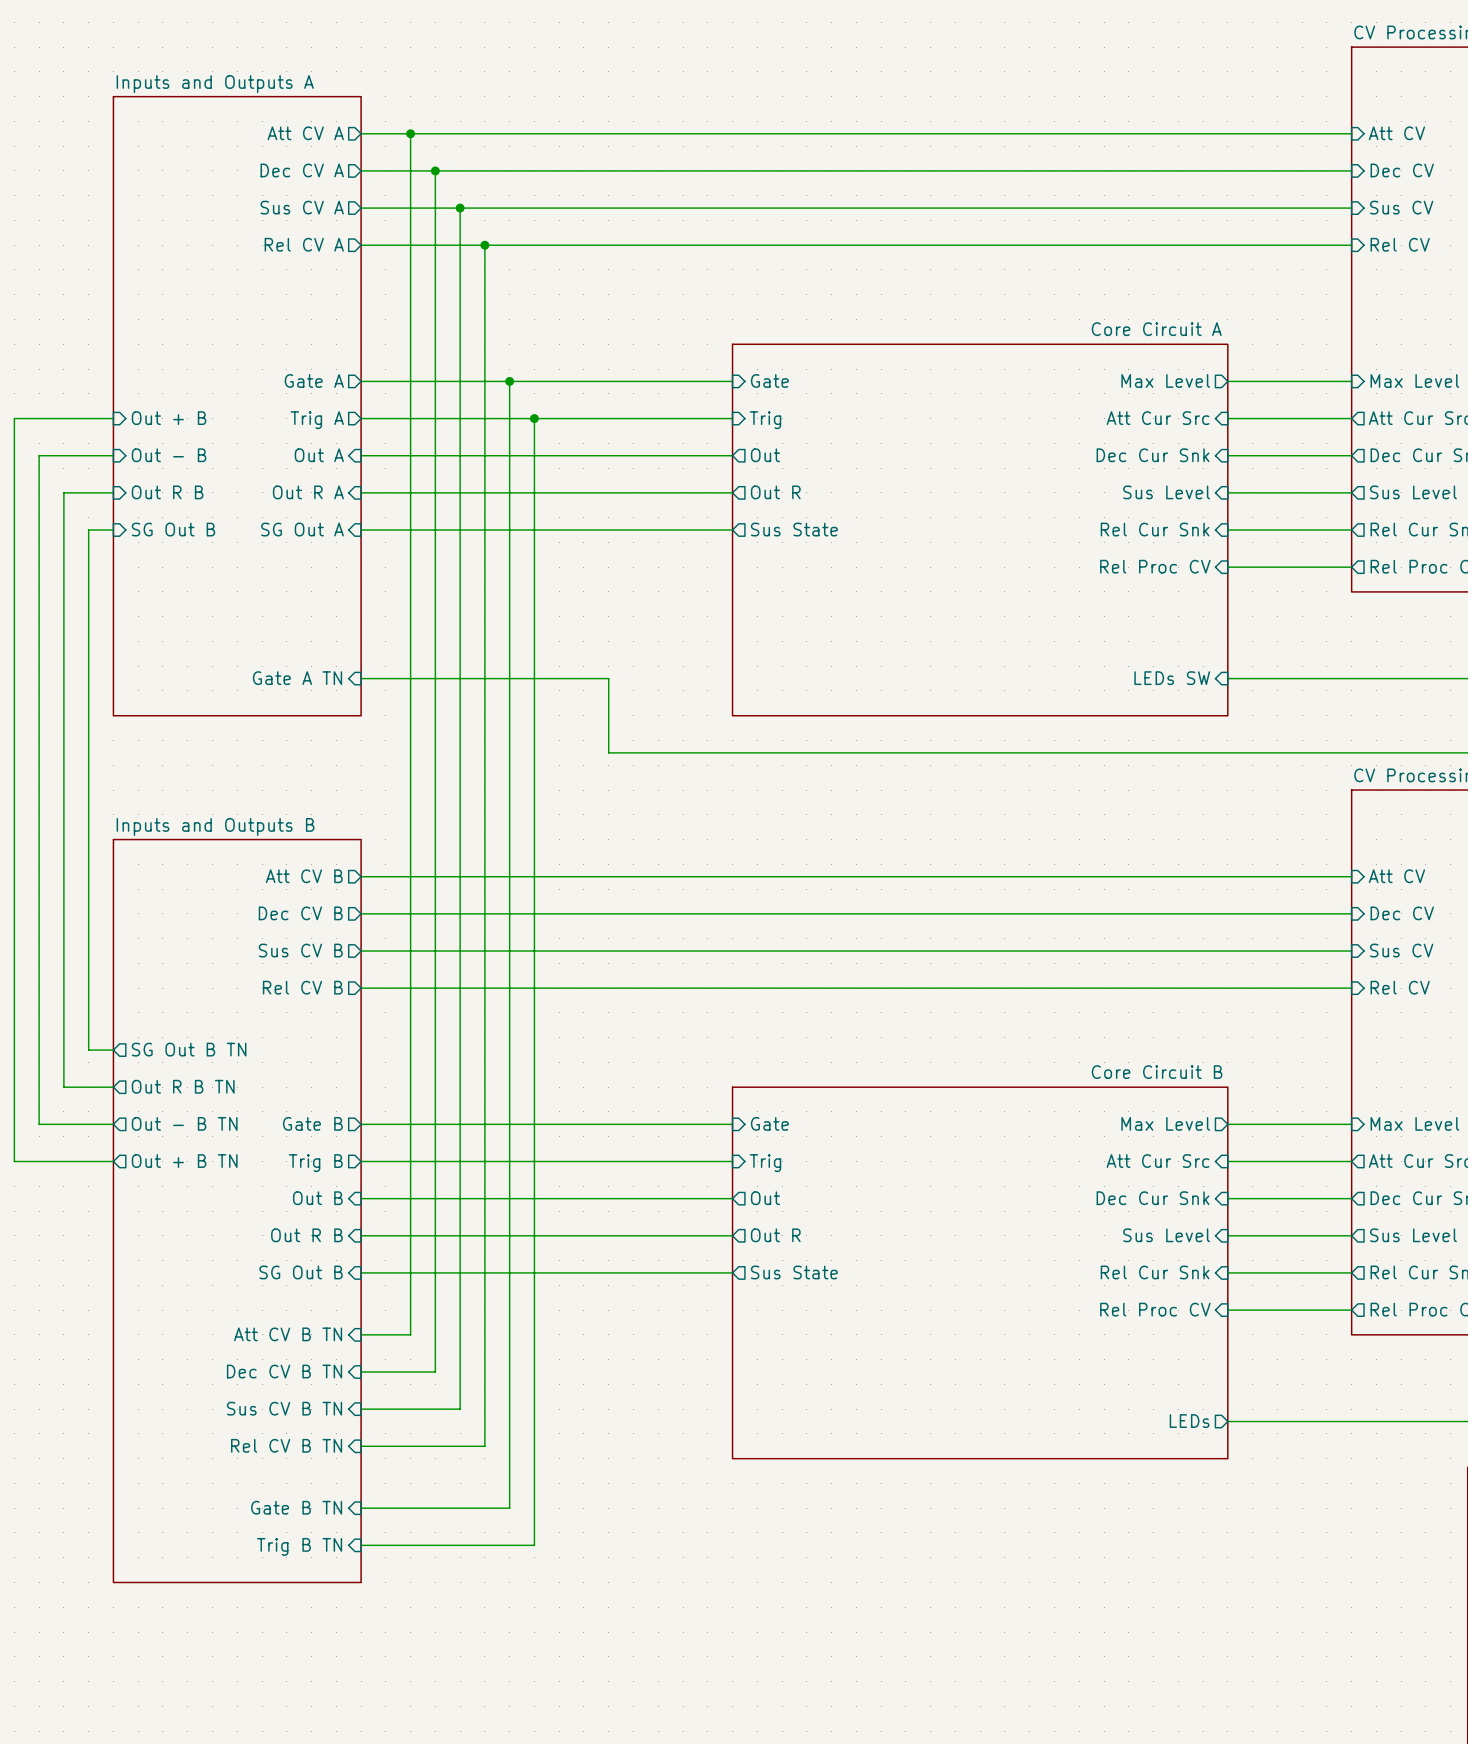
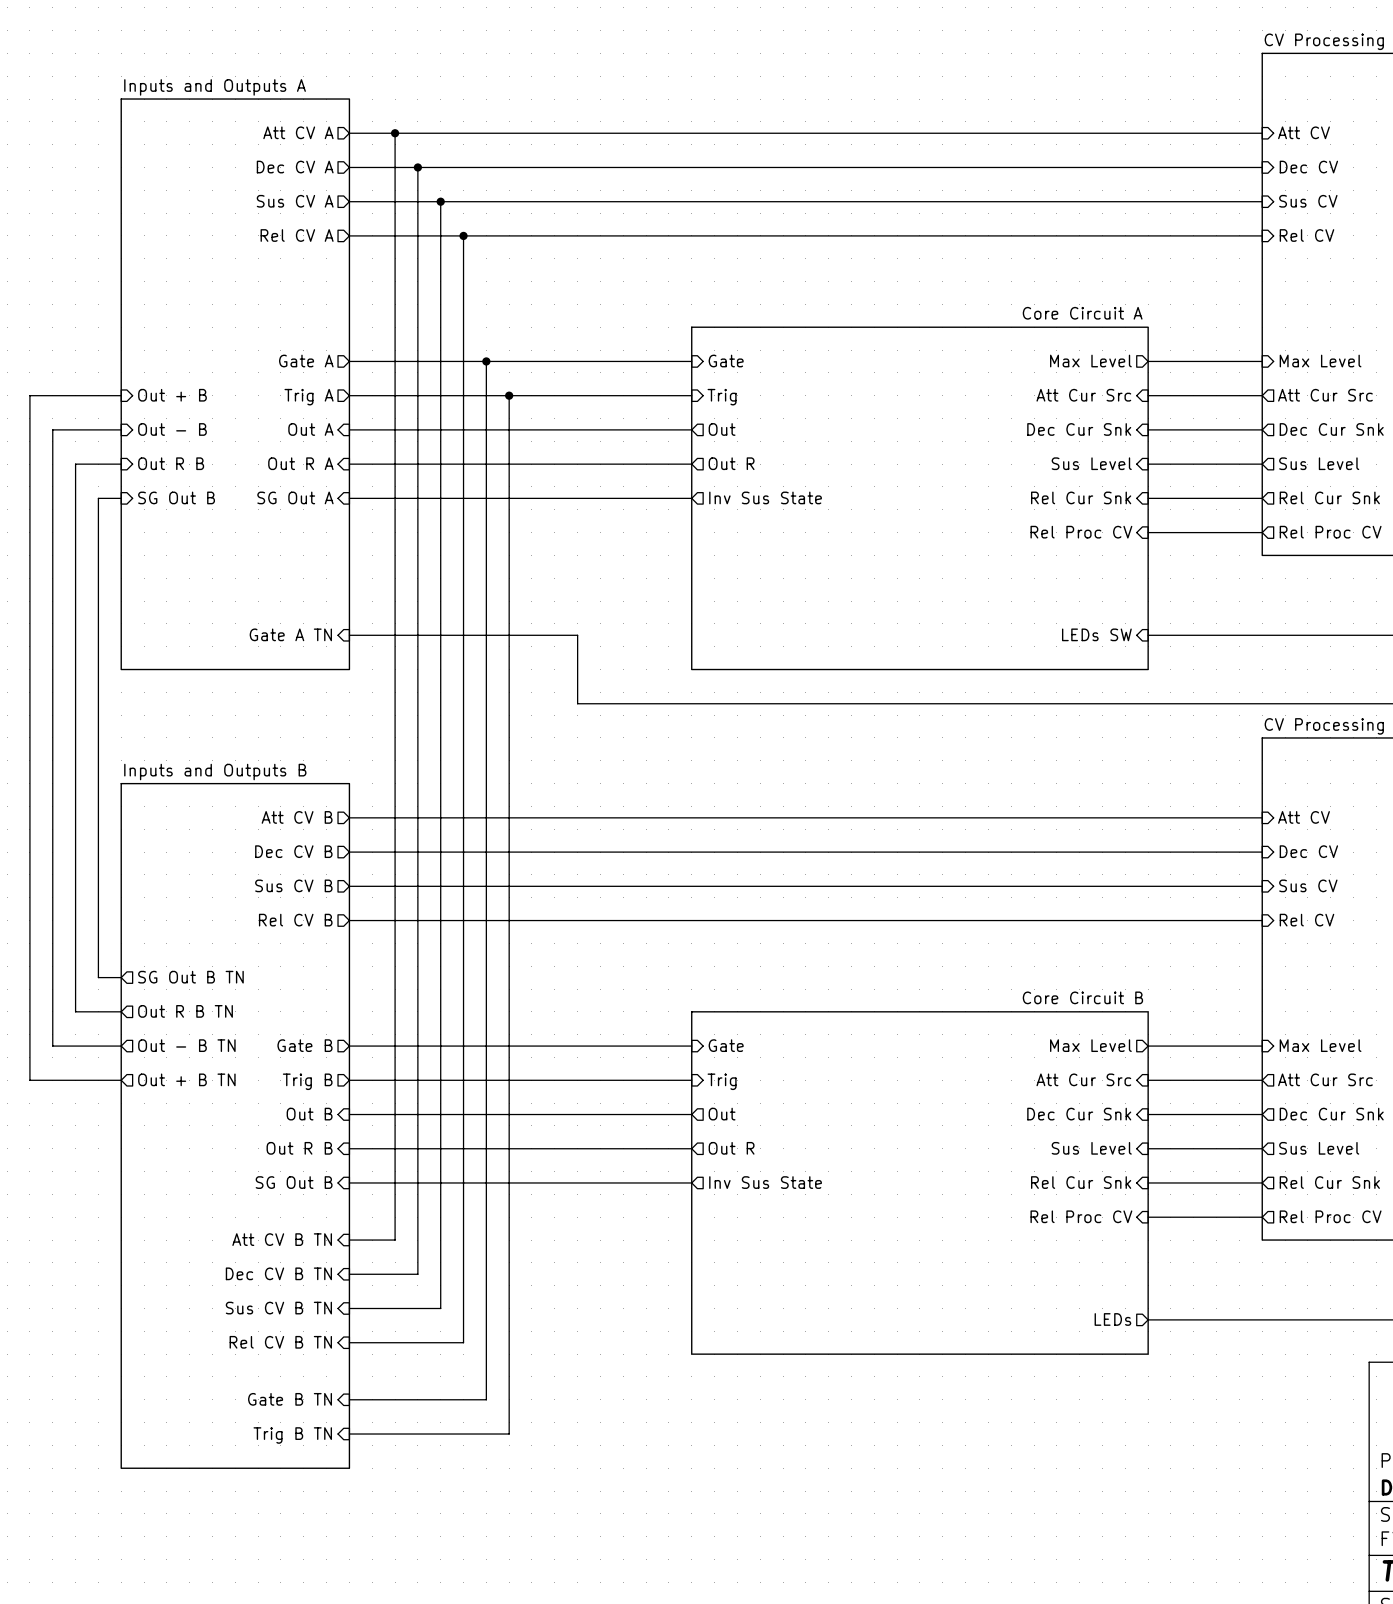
sheet pin: Sus State (794, 529) -> Inv Sus State (765, 497)
sheet pin: Sus State (794, 1272) -> Inv Sus State (765, 1182)

